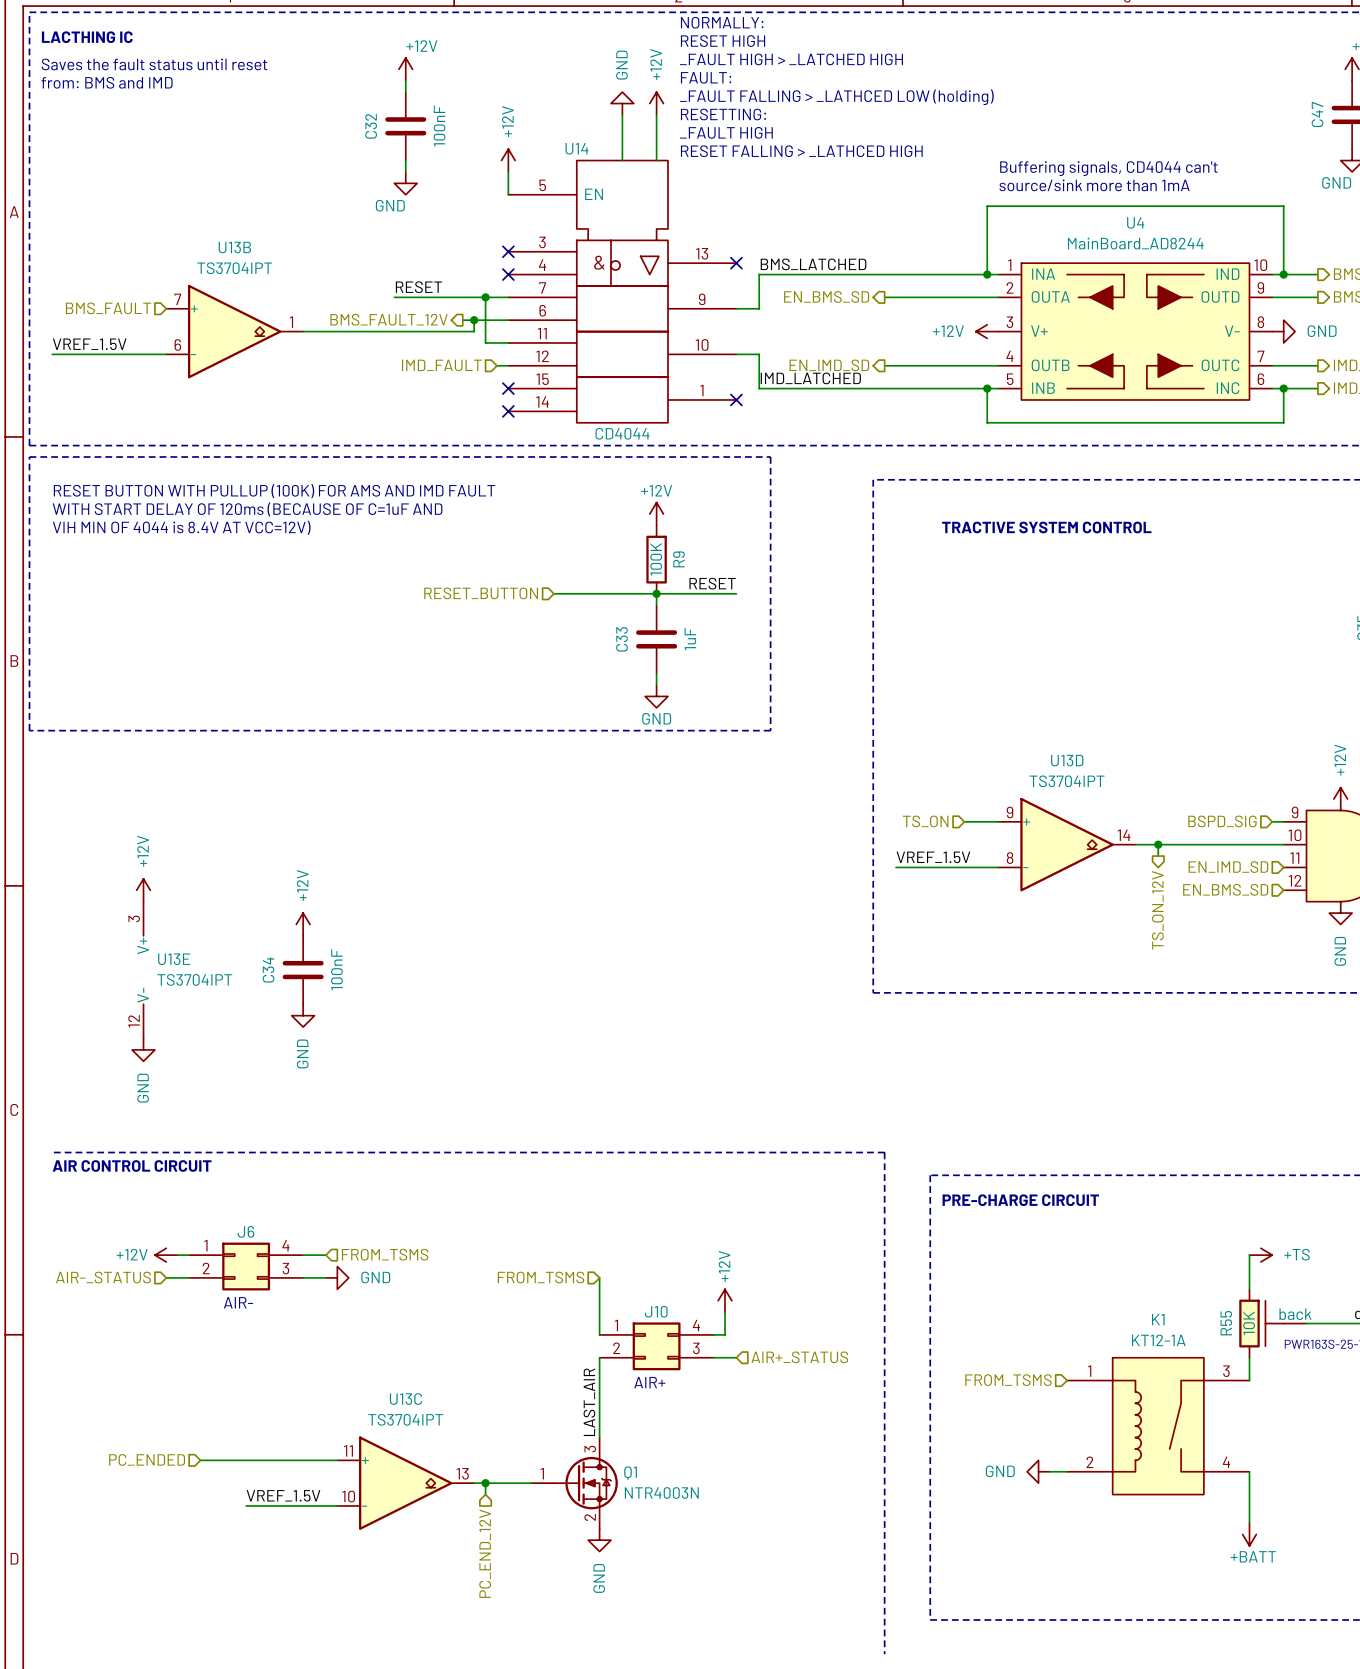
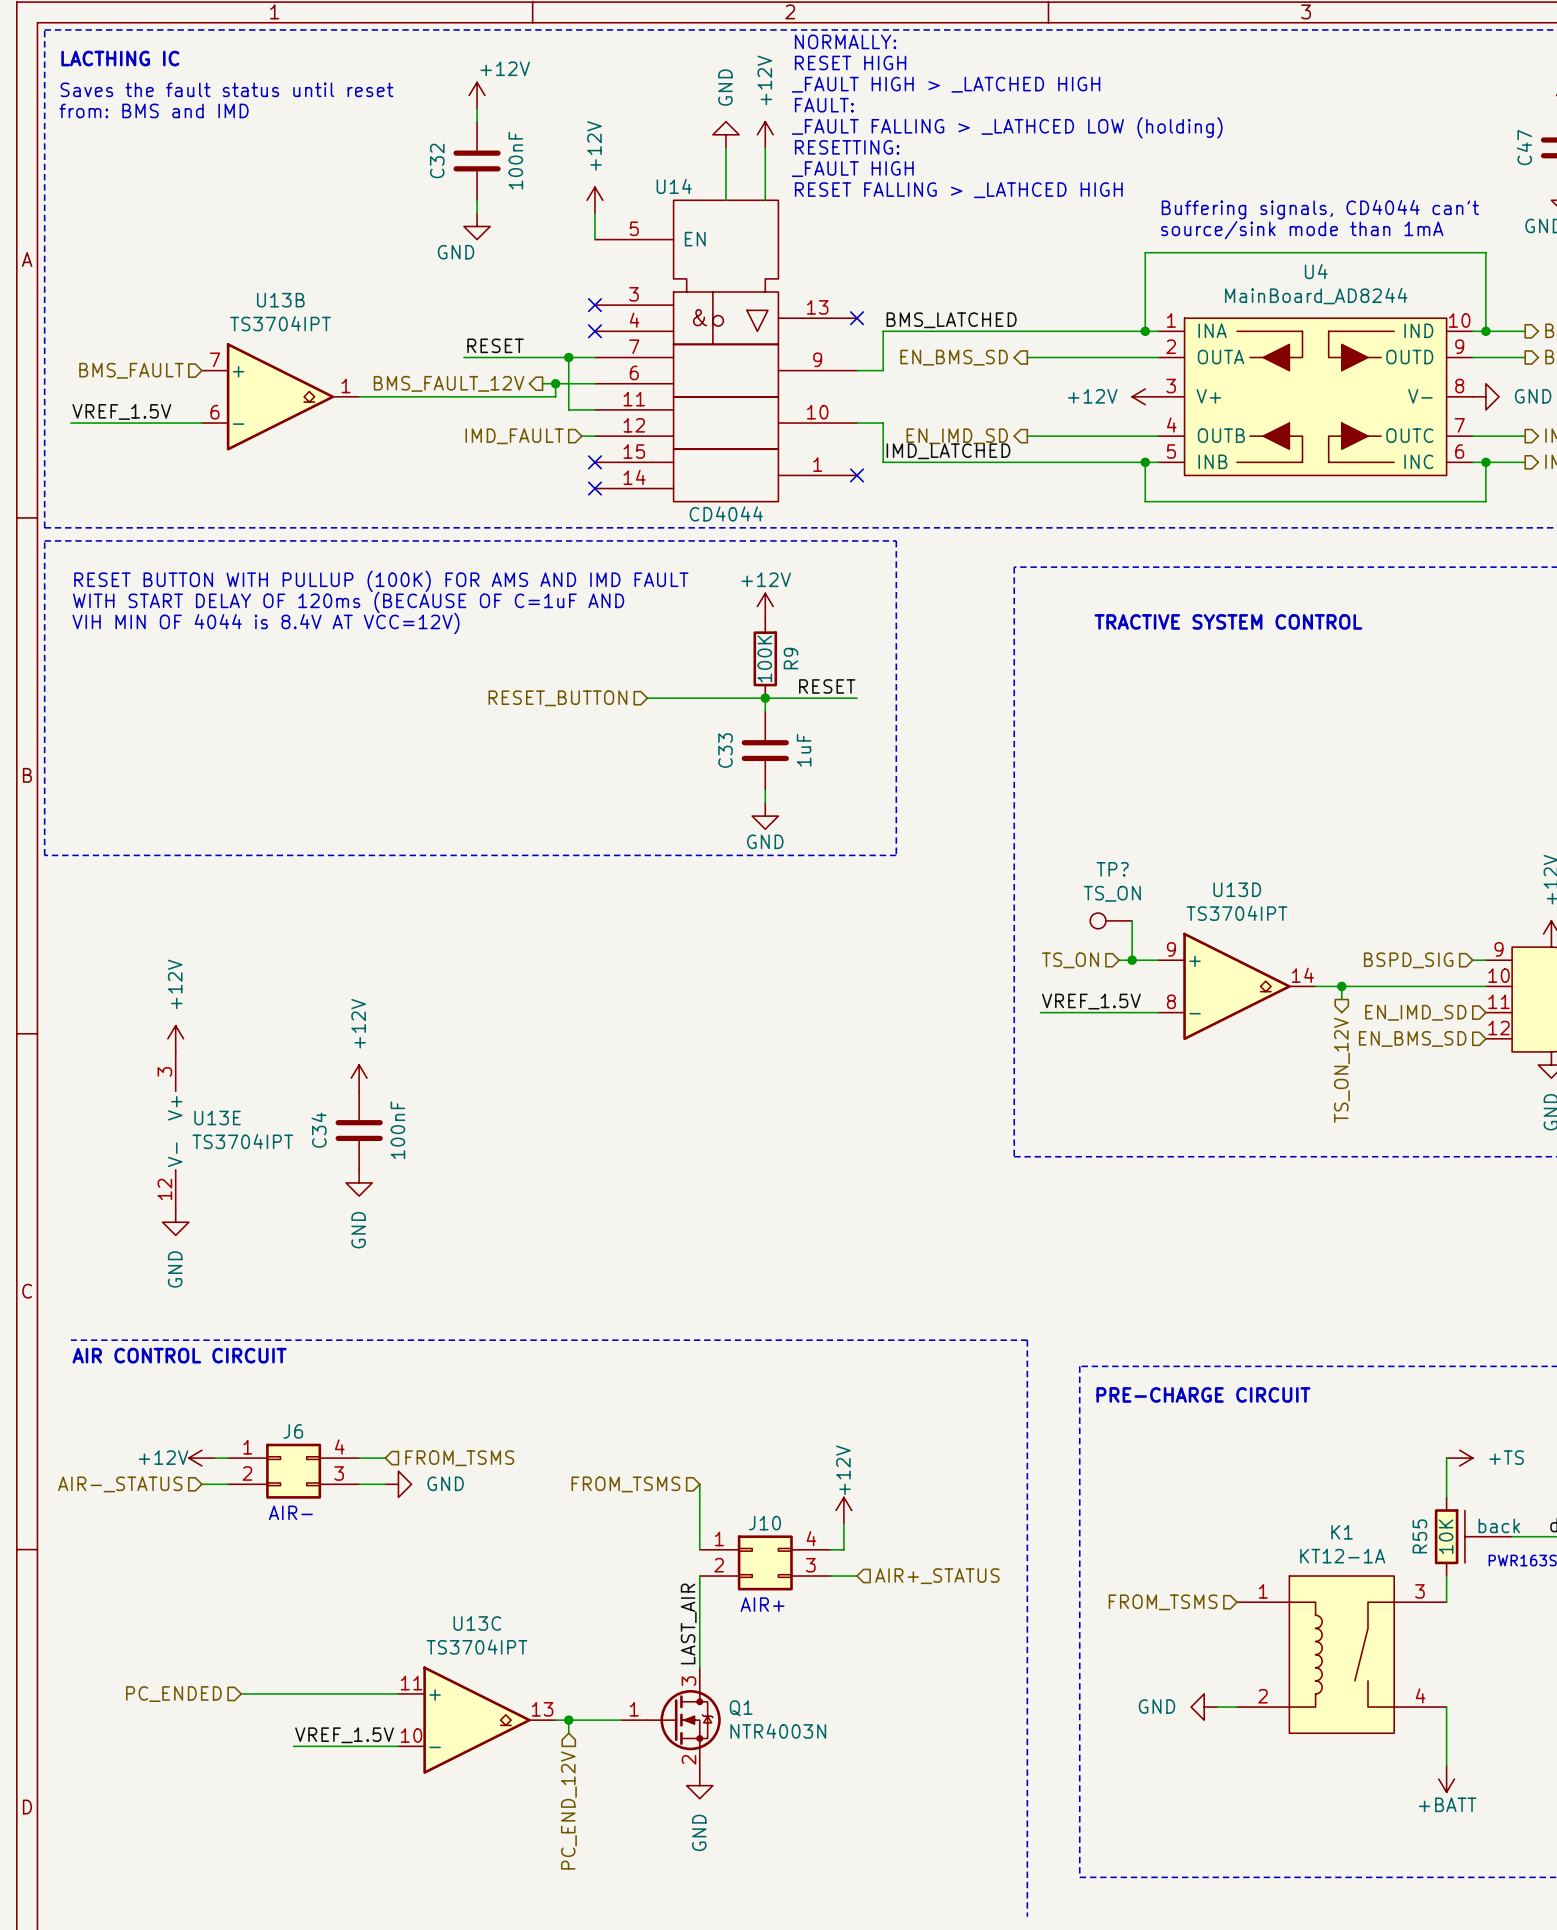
text: source/sink more than 1mA (1094, 185) -> source/sink mode than 1mA (1302, 230)
TP?: none -> TS_ON (1111, 920)
wire: none -> (1132, 920) (1132, 960)
junction: none -> (1132, 960)

